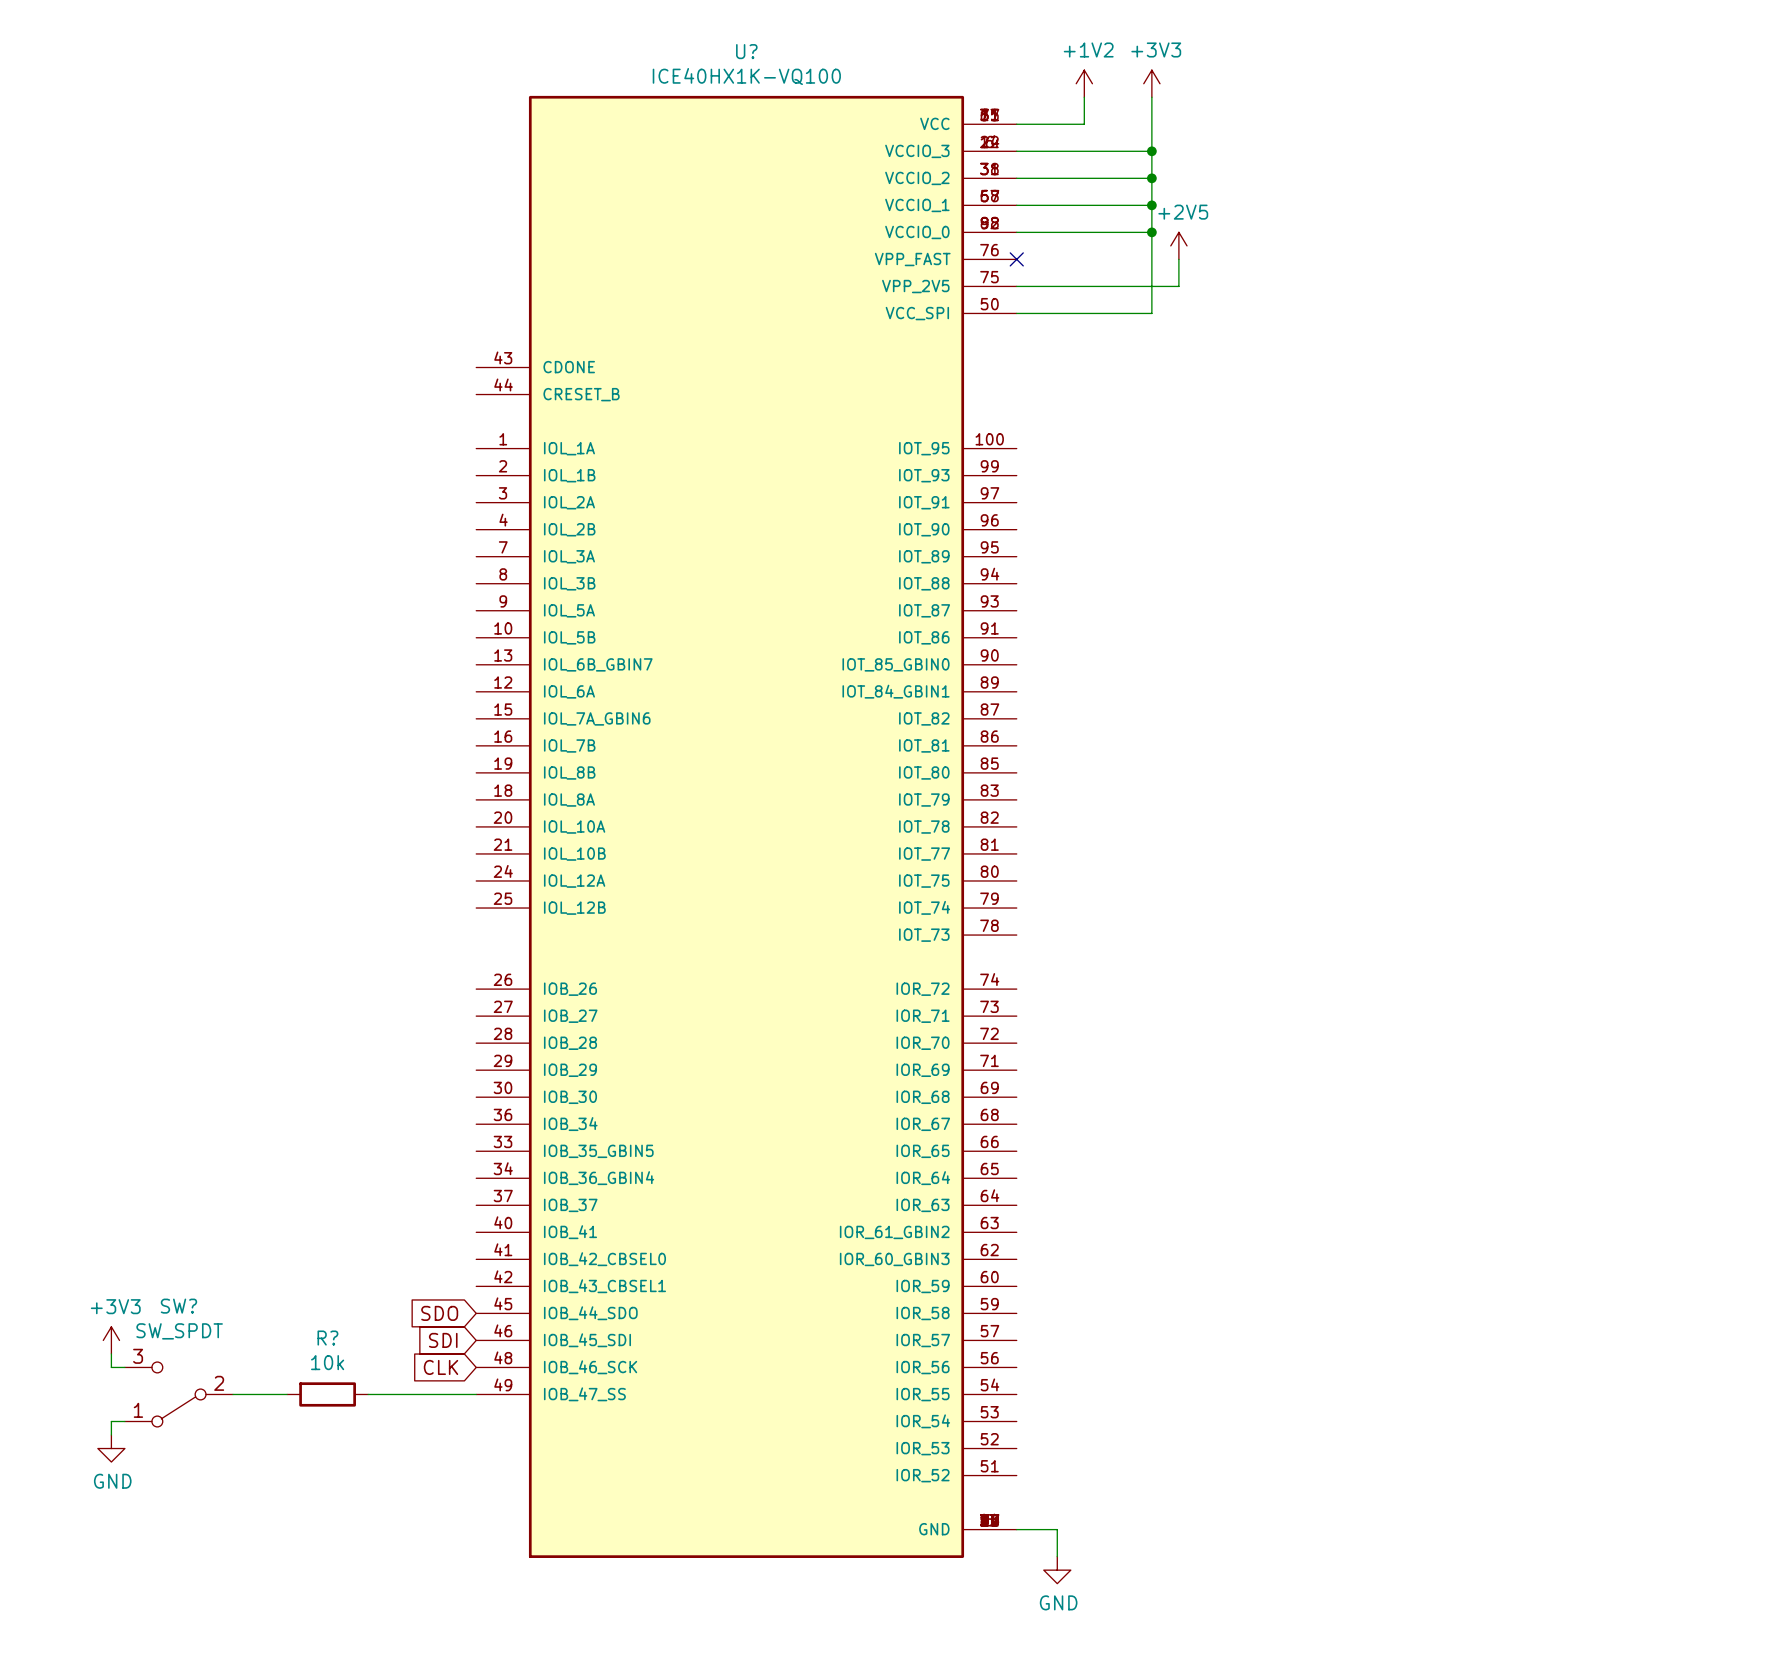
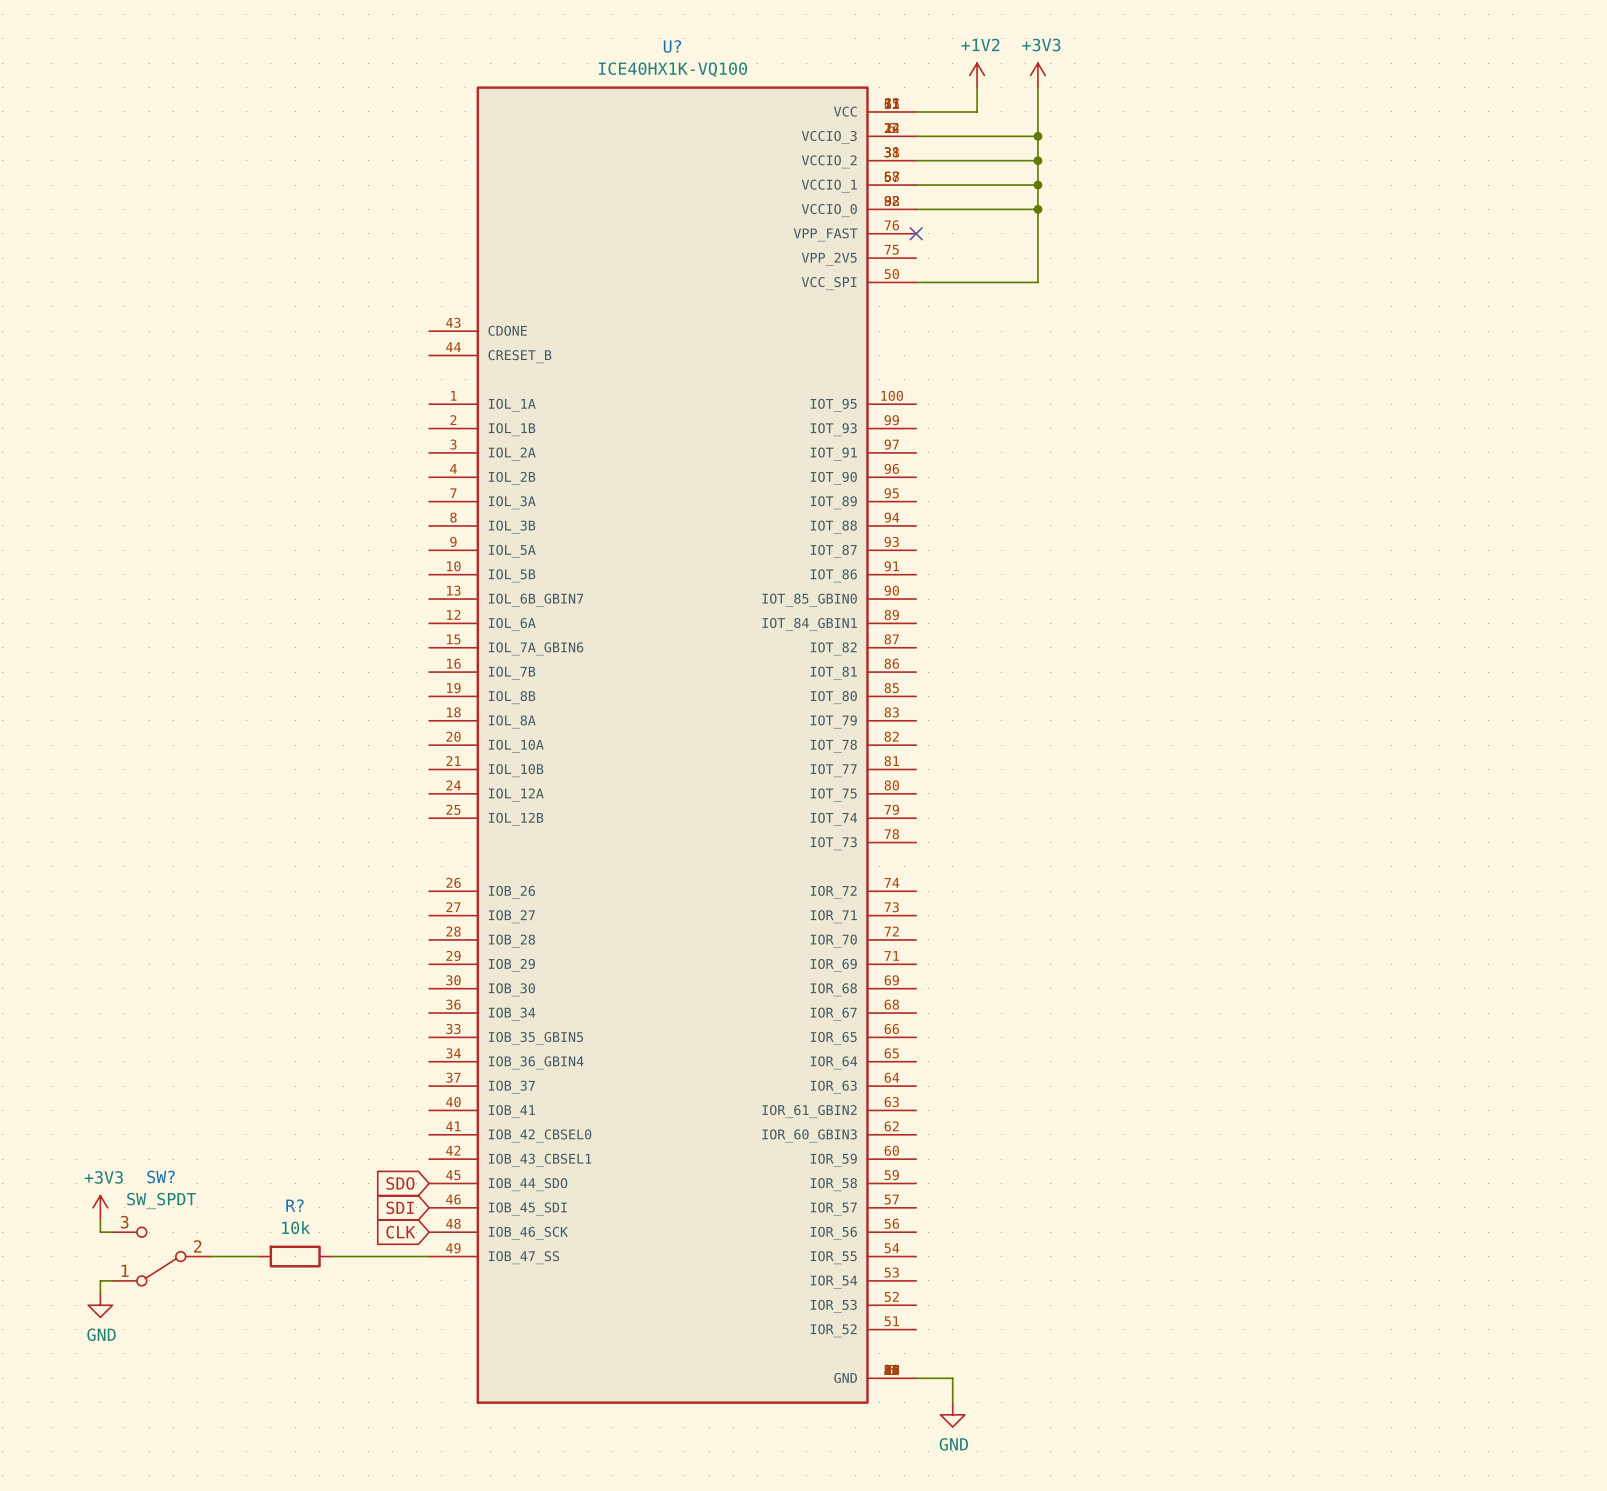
power symbol: +2V5 (1178, 245) -> none
wire: (1178, 259) (1178, 286) (1016, 286) -> none

